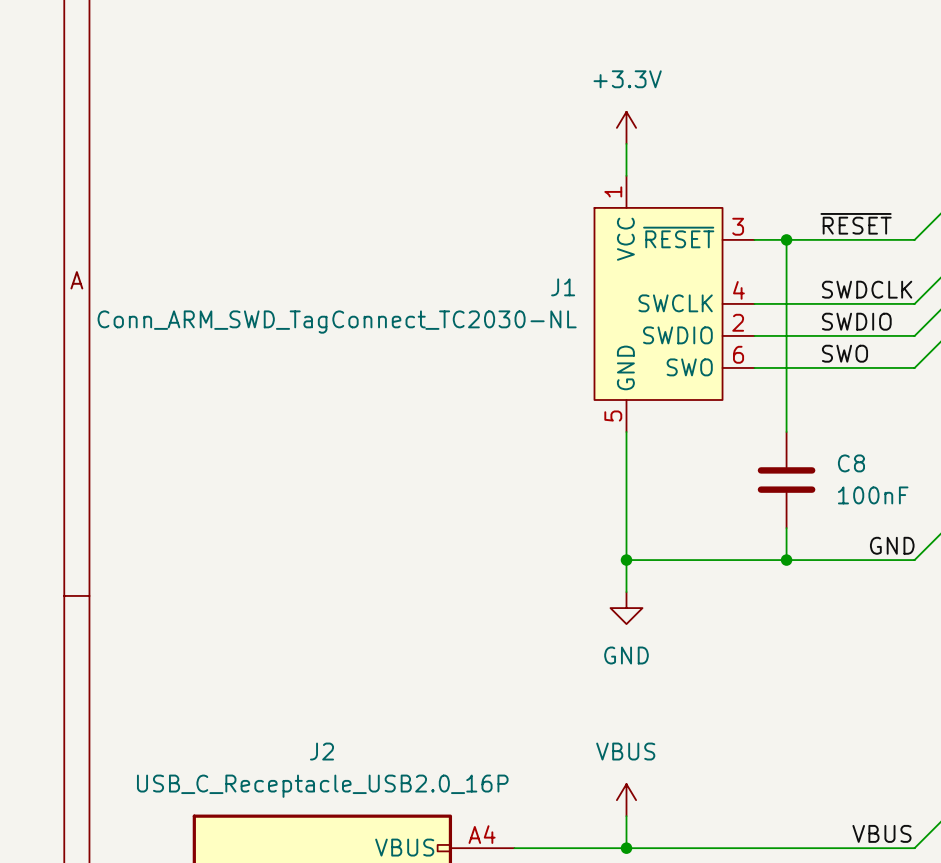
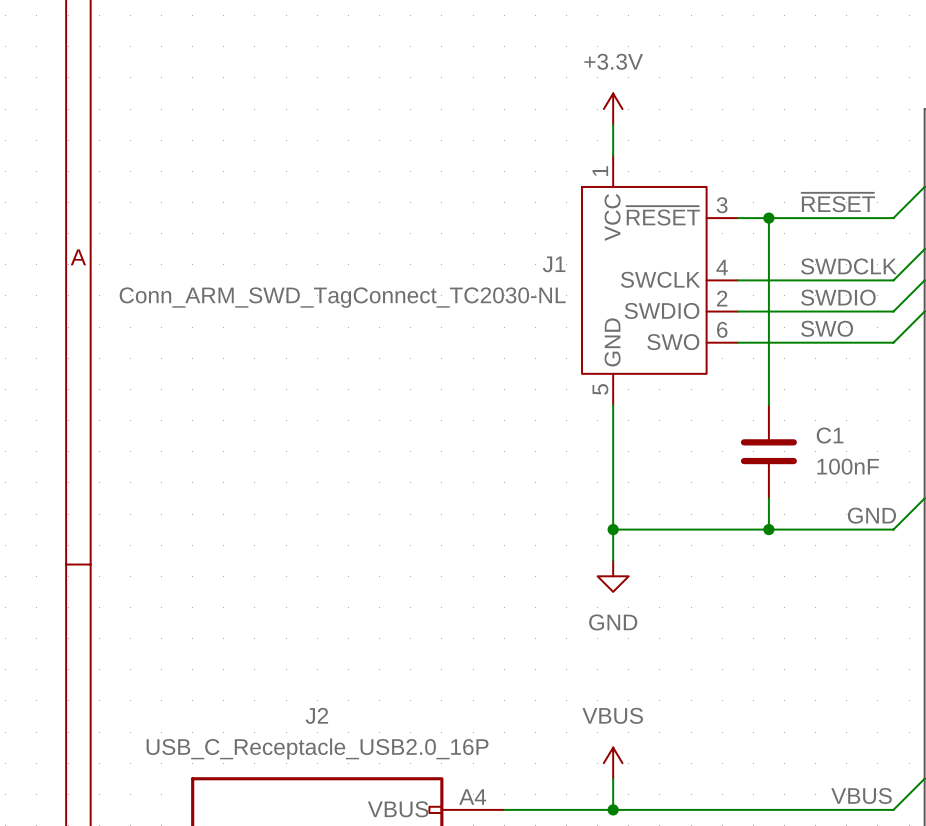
C8 name: C8 (851, 463) -> C1 (830, 435)

